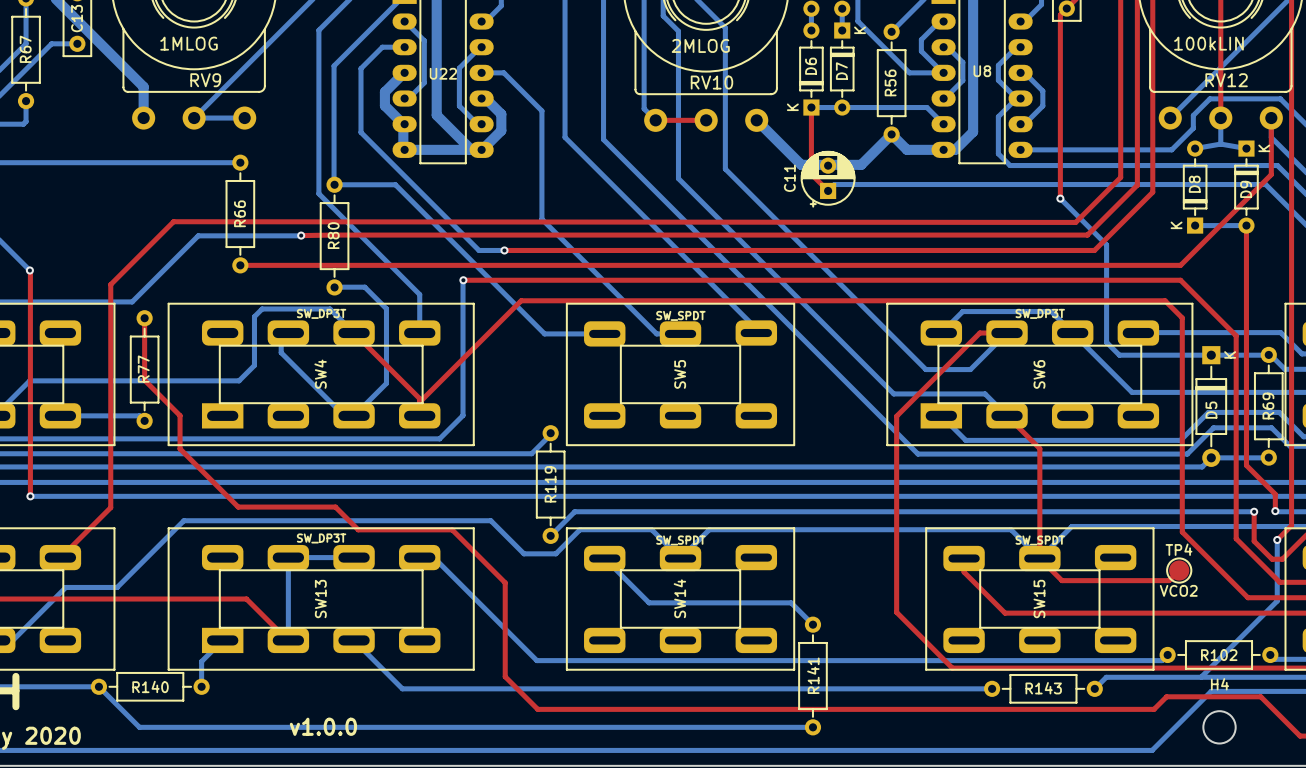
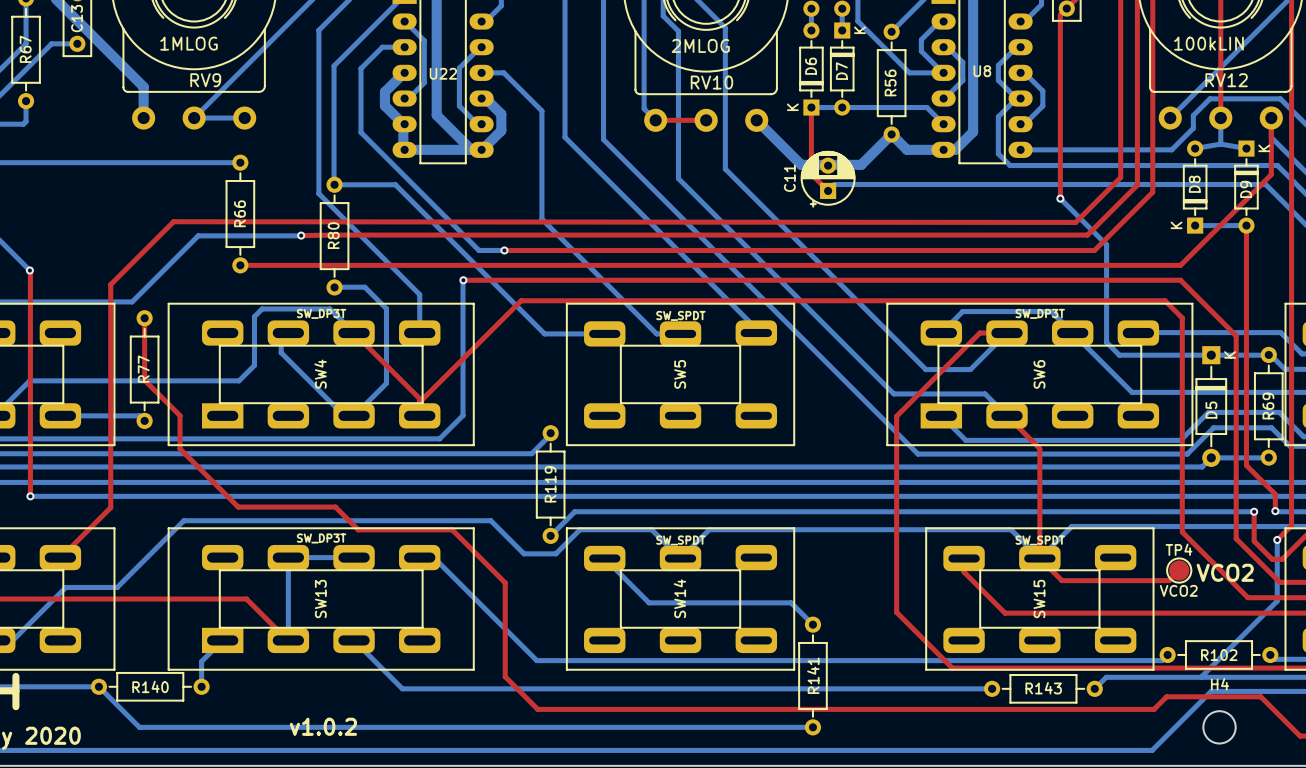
text: none -> VCO2 (1225, 572)
text: v1.0.0 (323, 726) -> v1.0.2 (323, 726)

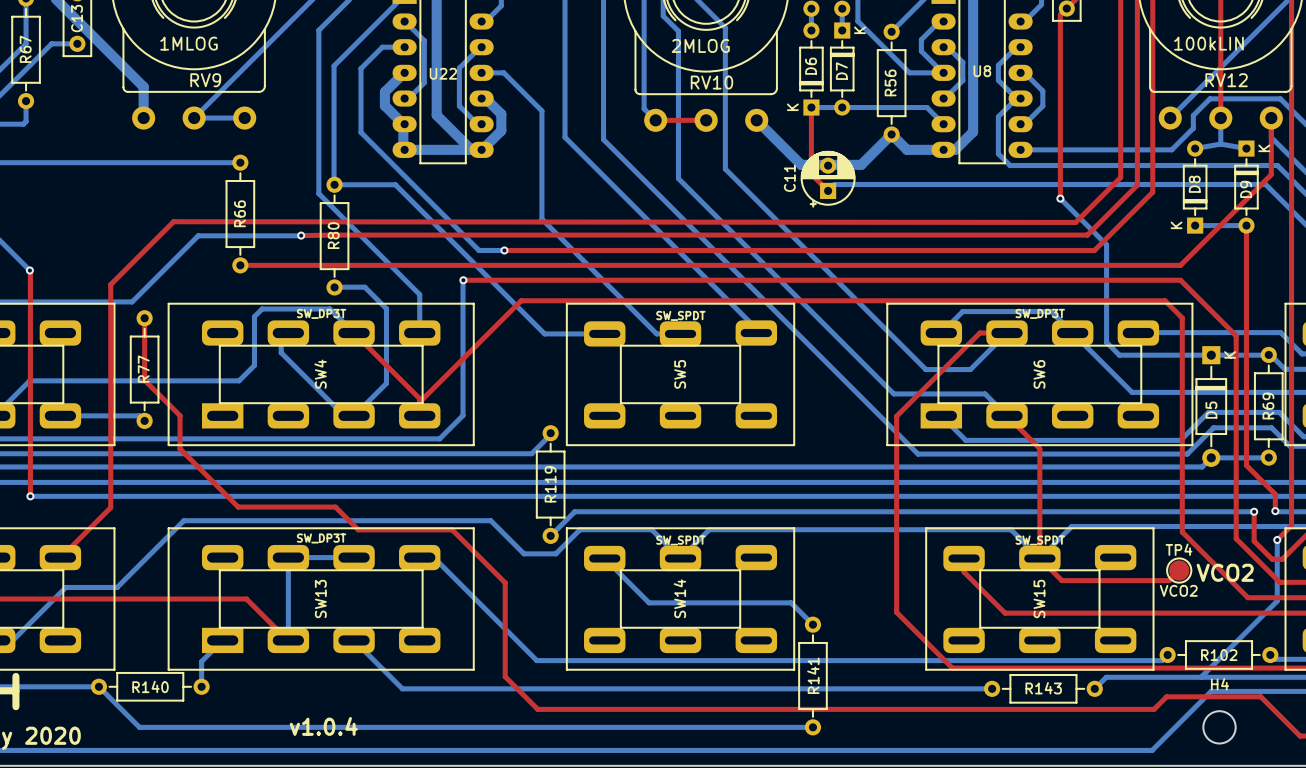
text: v1.0.2 (323, 726) -> v1.0.4 (323, 726)

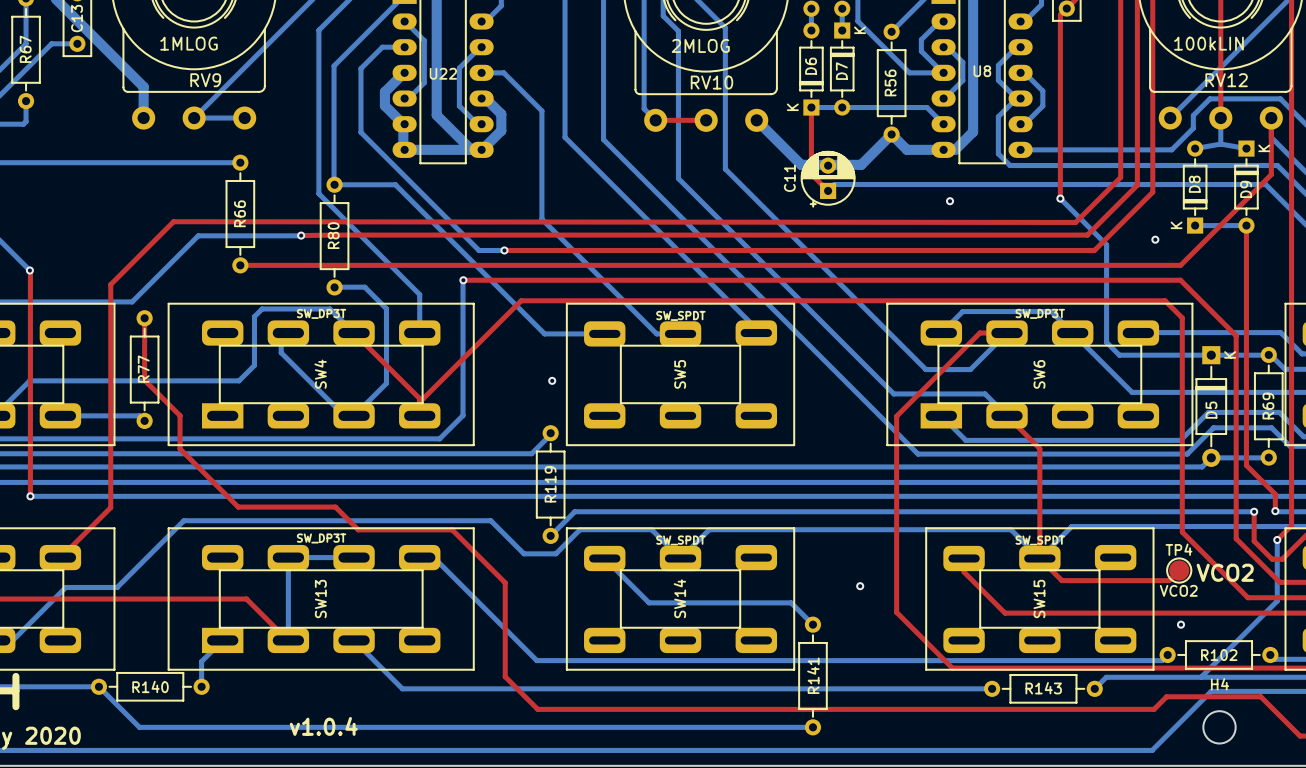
via: none -> (950, 201)
via: none -> (1155, 239)
via: none -> (552, 380)
via: none -> (860, 586)
via: none -> (1181, 624)

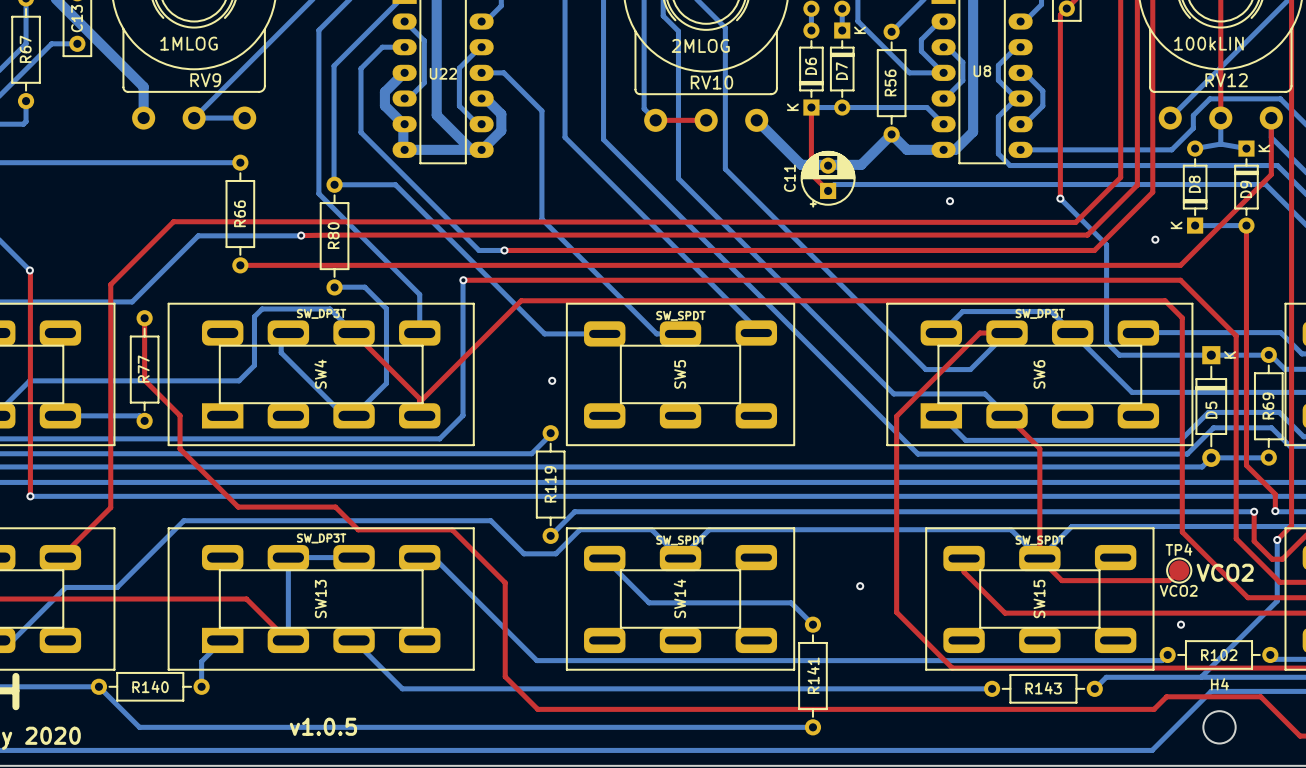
text: v1.0.4 (323, 726) -> v1.0.5 (323, 726)

